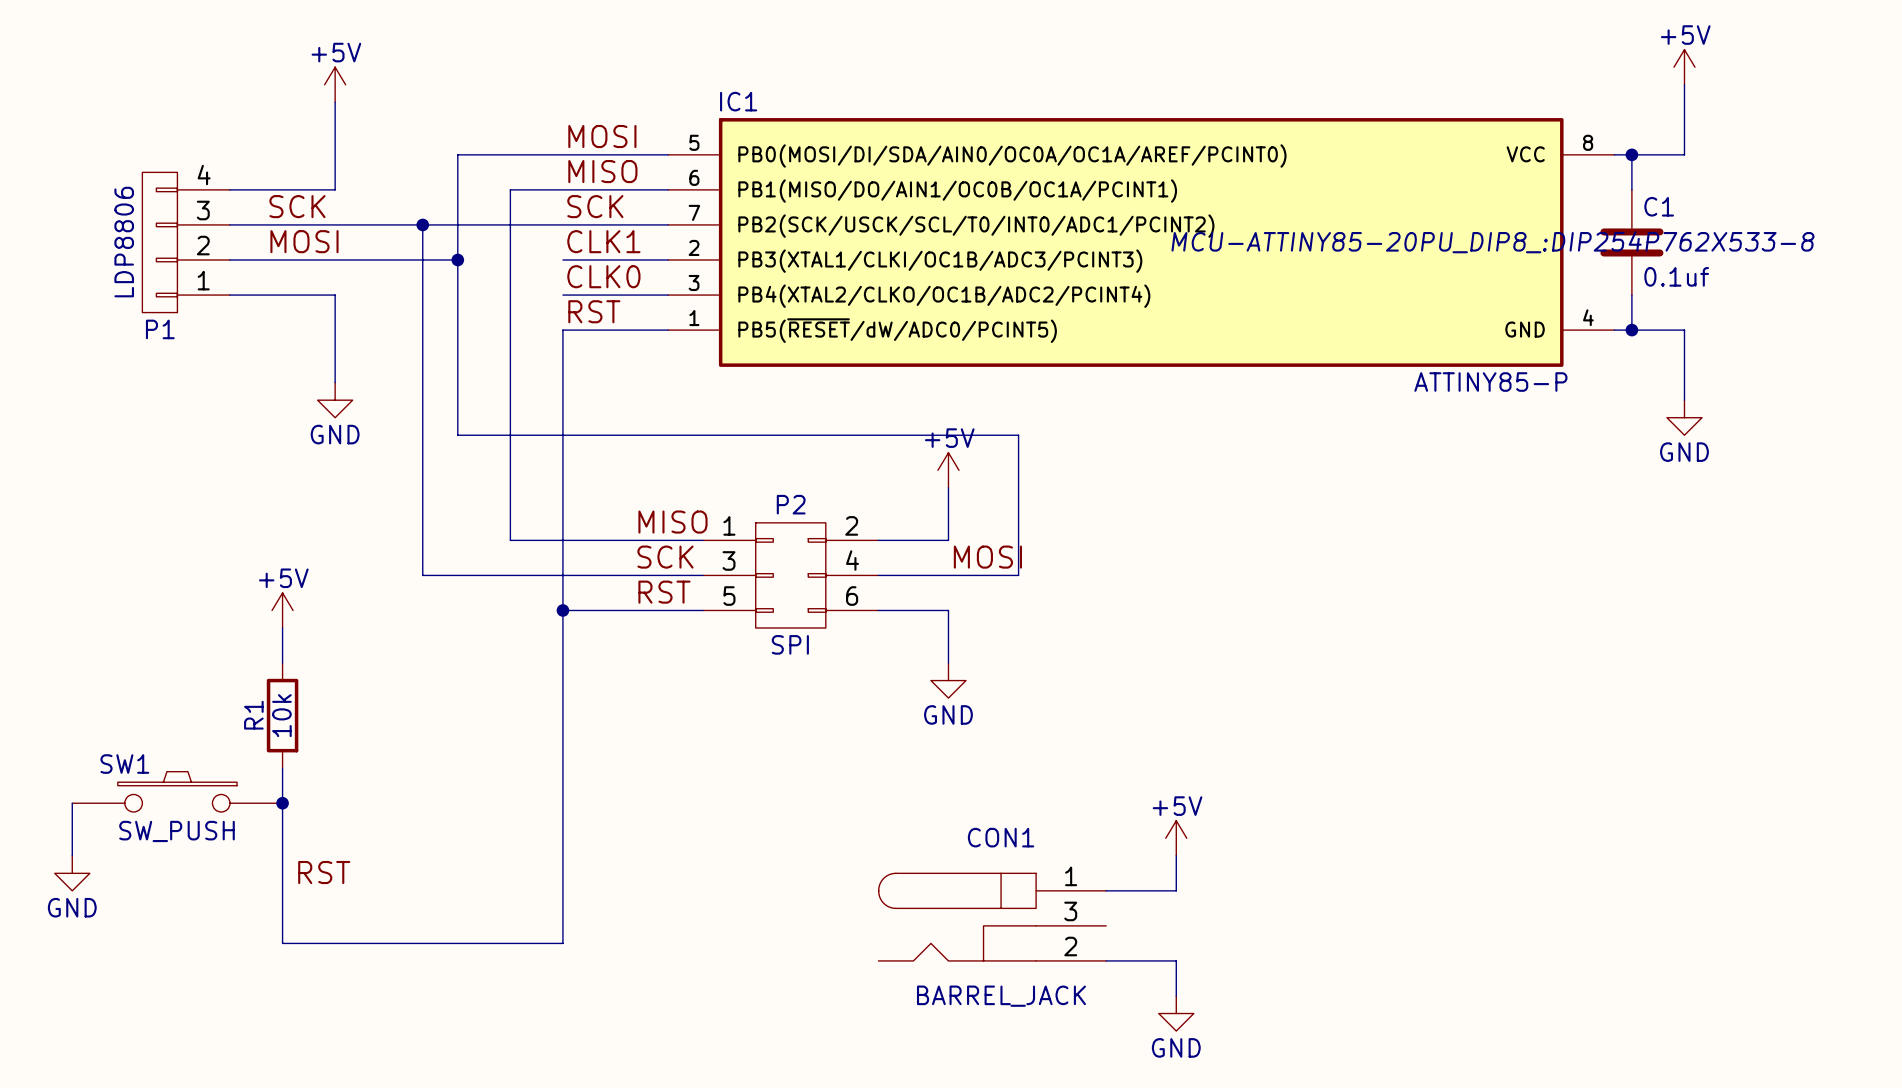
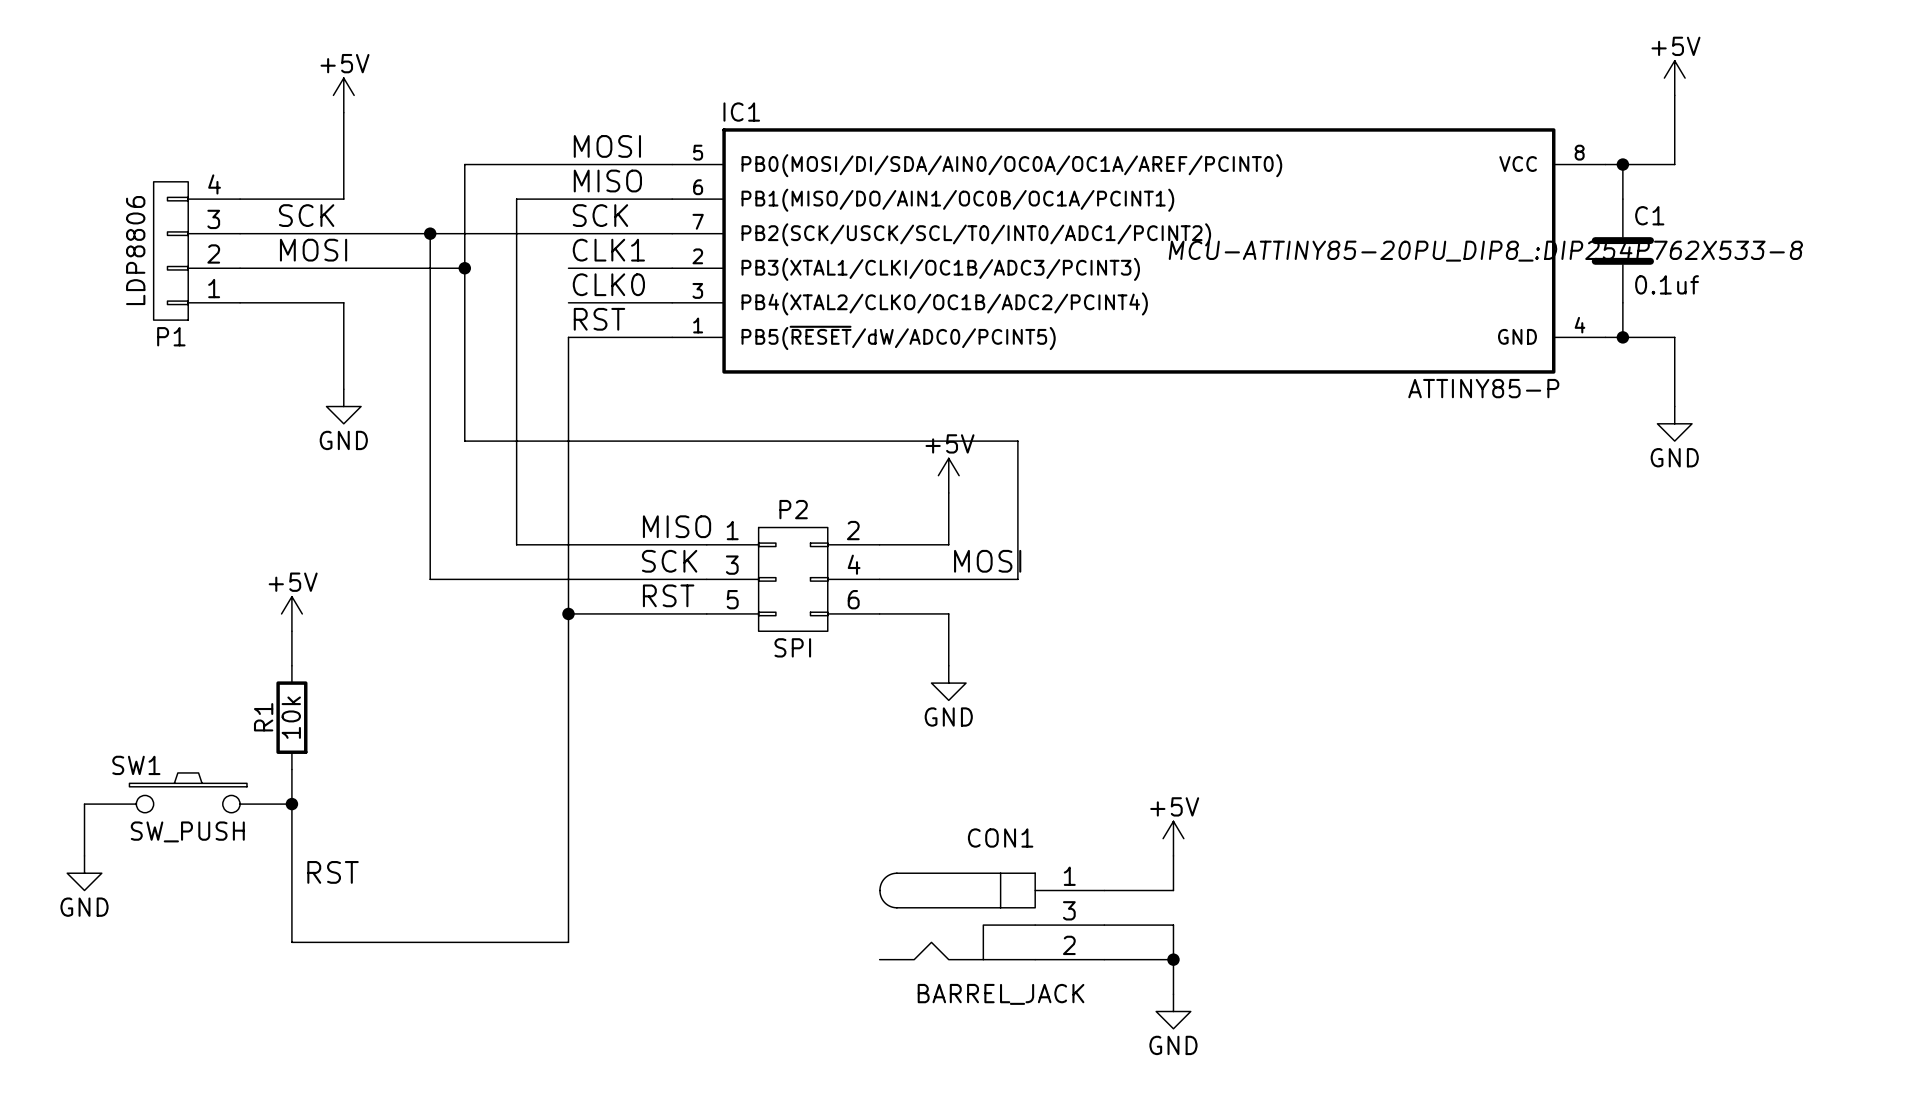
wire: none -> (1104, 925) (1173, 925) (1173, 959)
junction: none -> (1173, 959)

